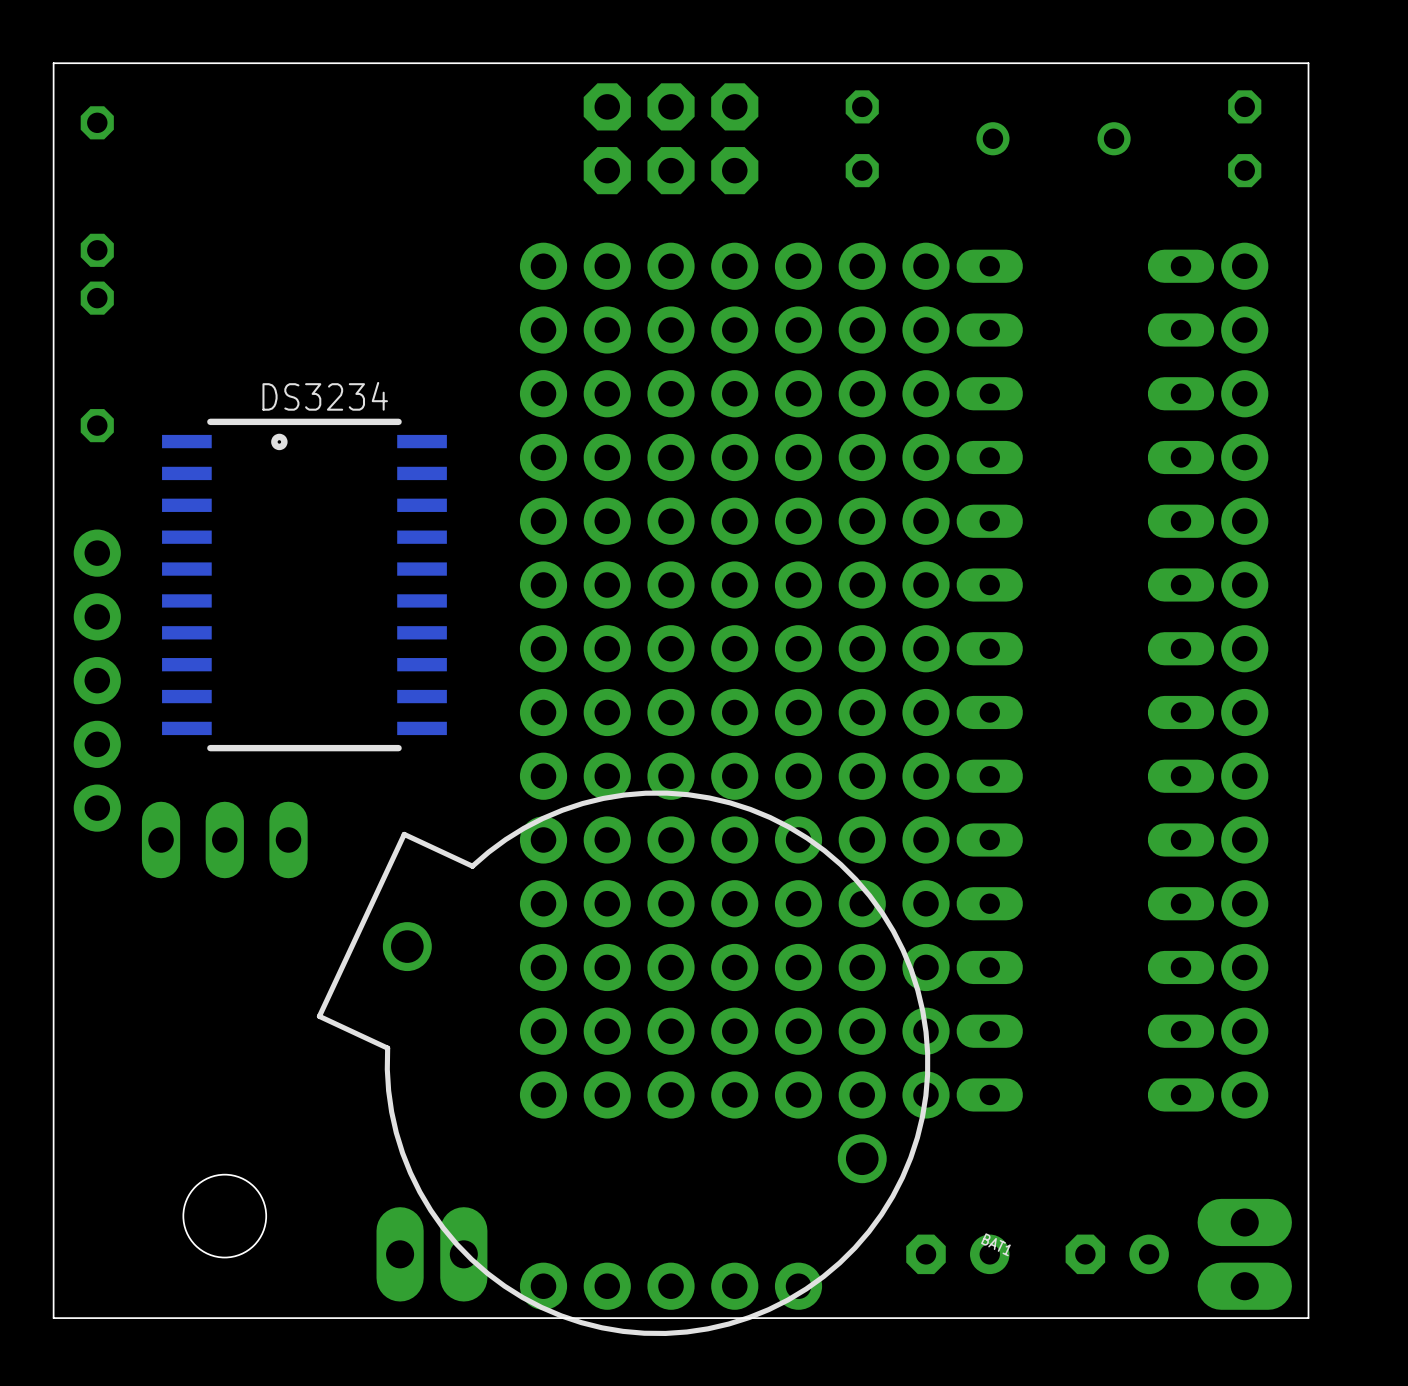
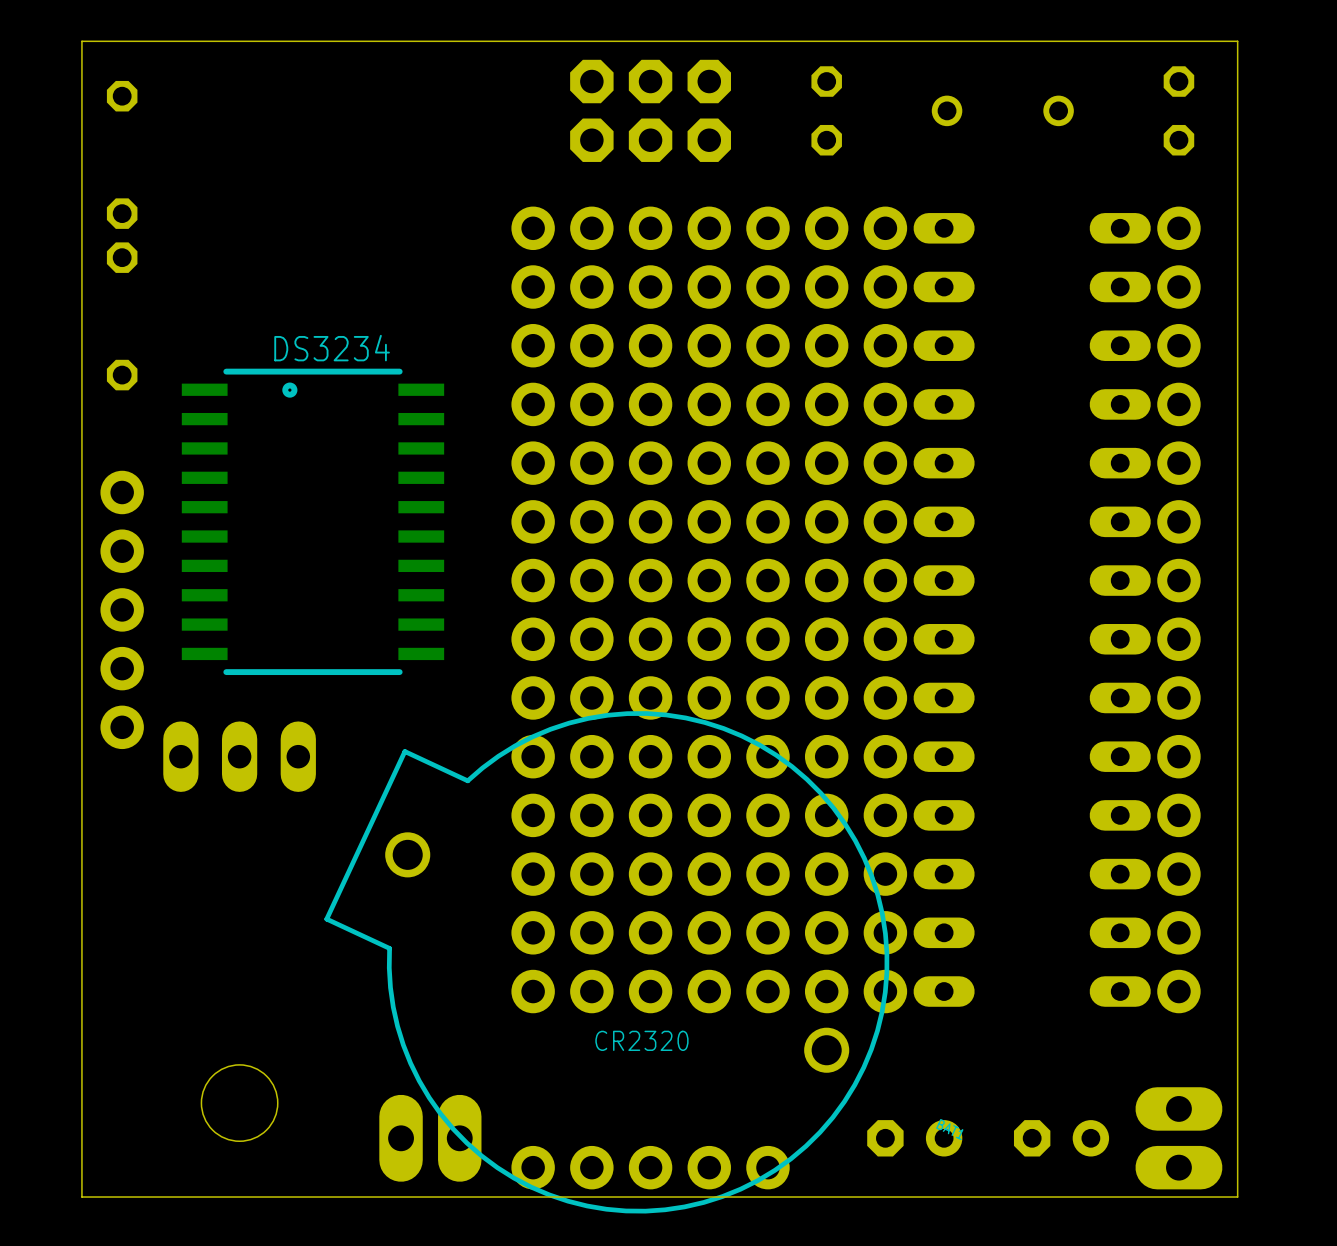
text: none -> CR2320 (641, 1040)

